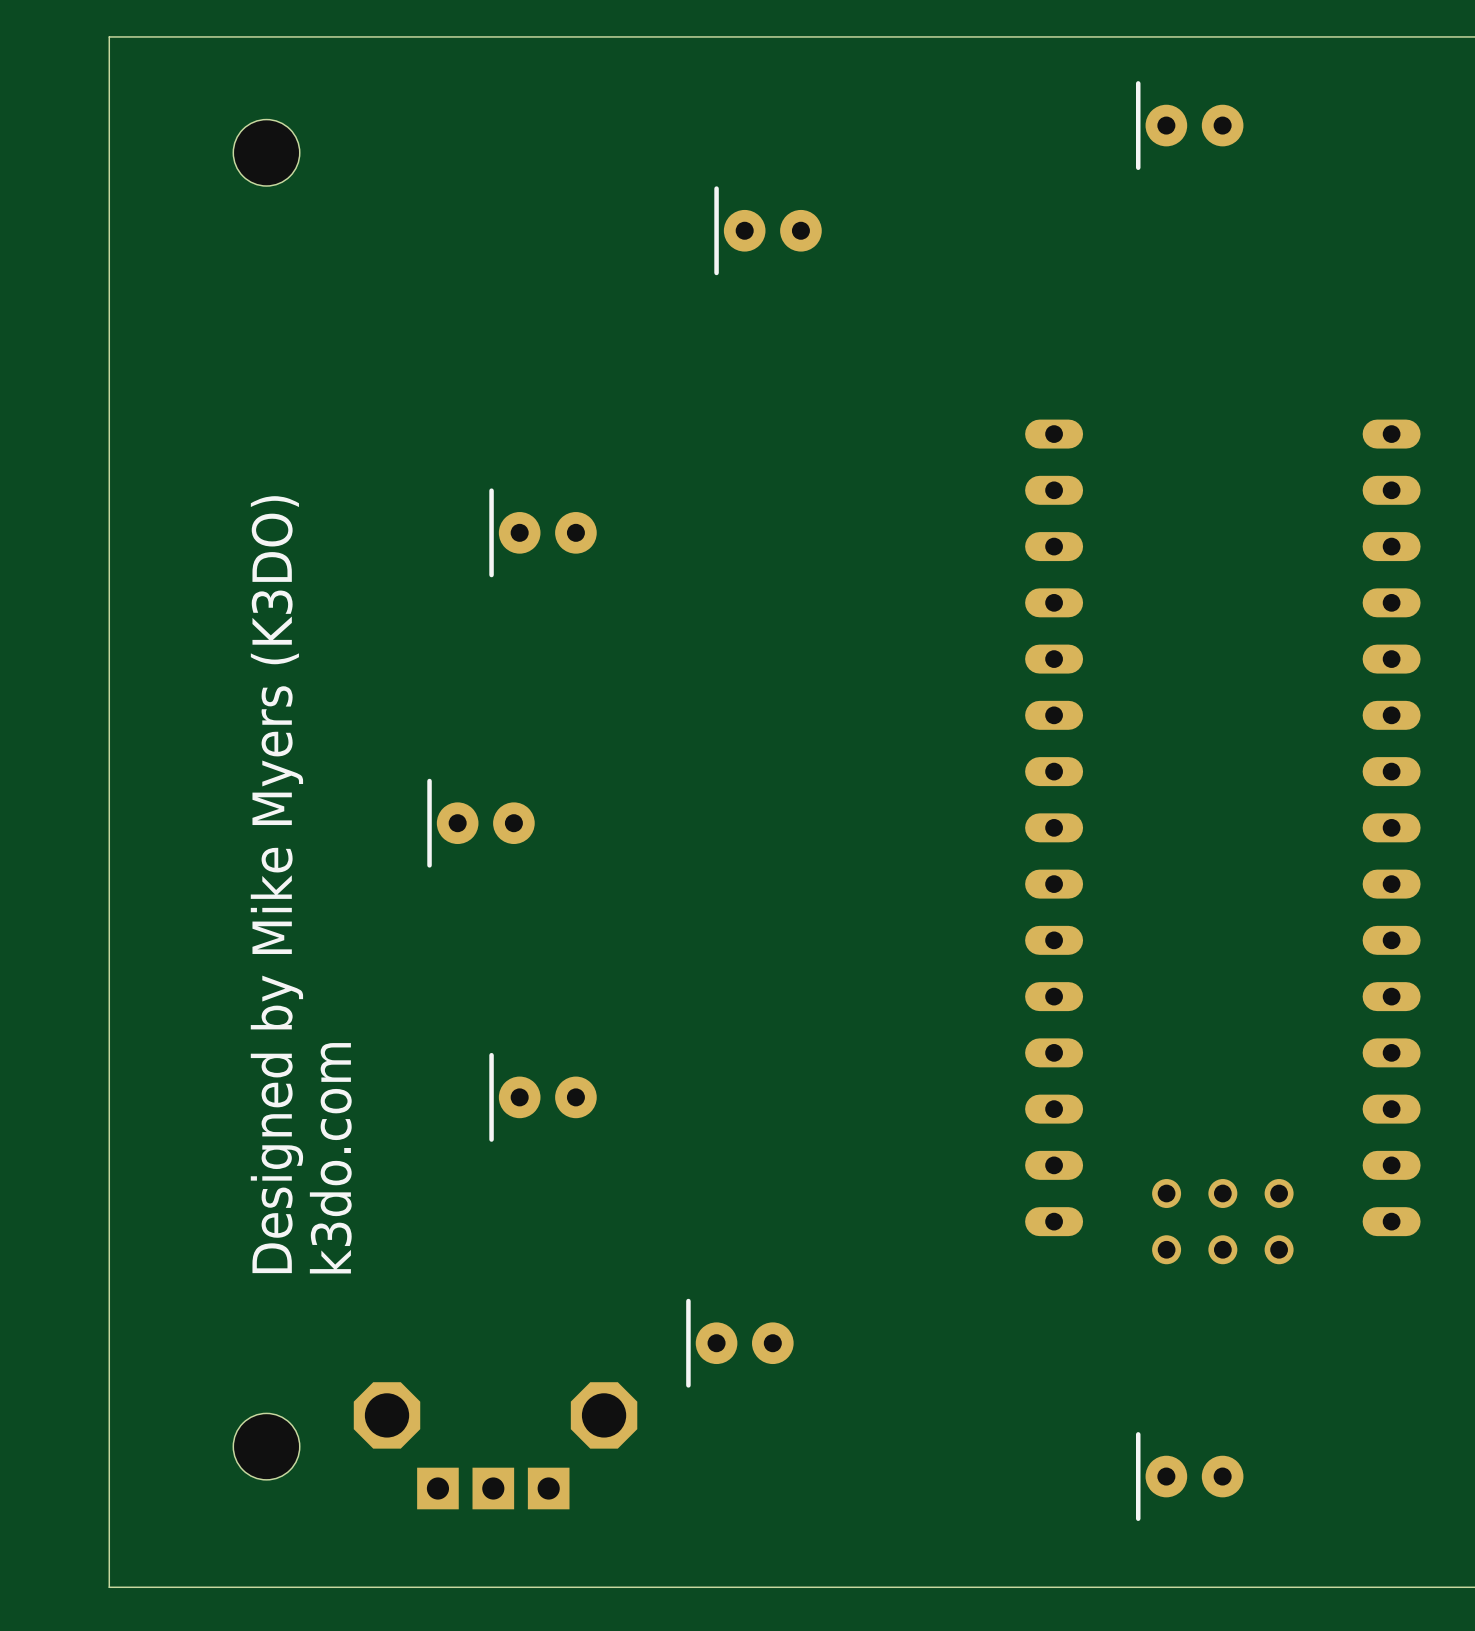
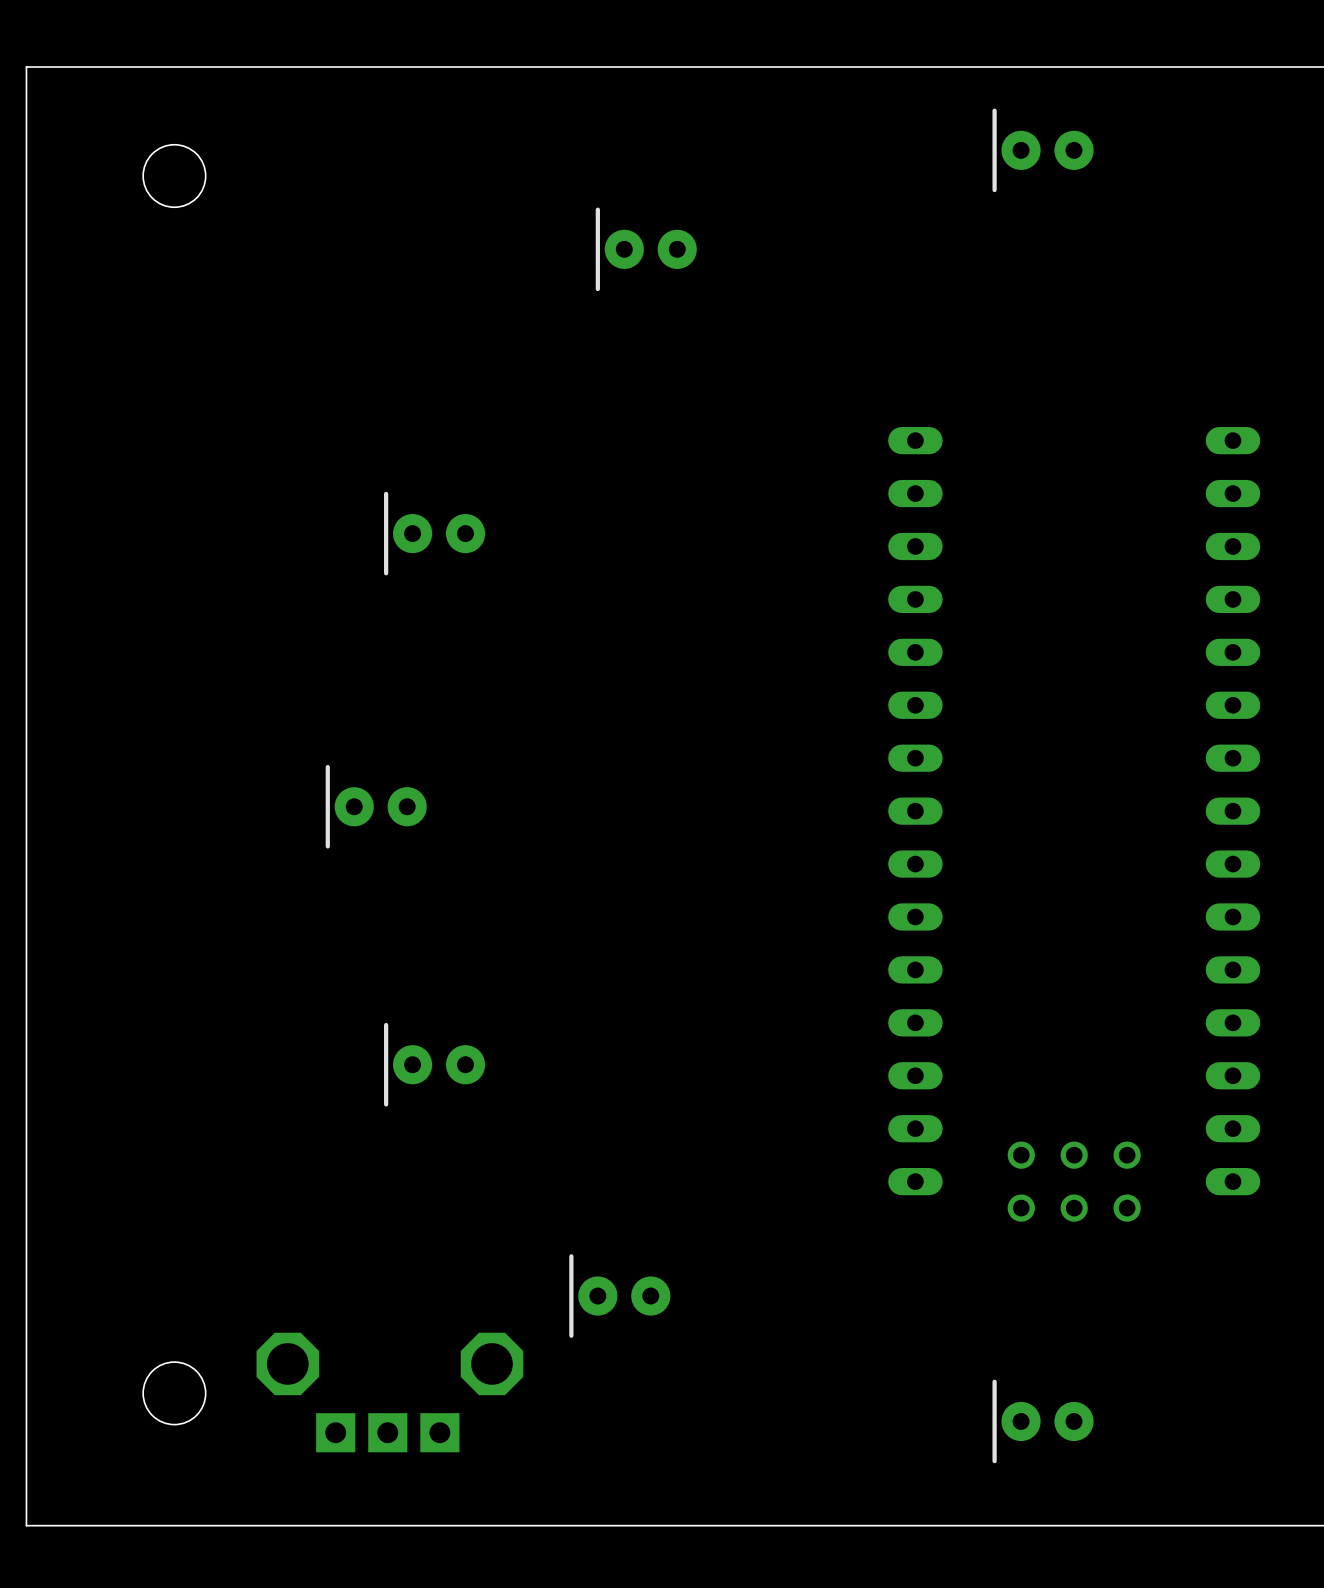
text: Designed by Mike Myers (K3DO) (276, 884) -> none
text: k3do.com (330, 1158) -> none

